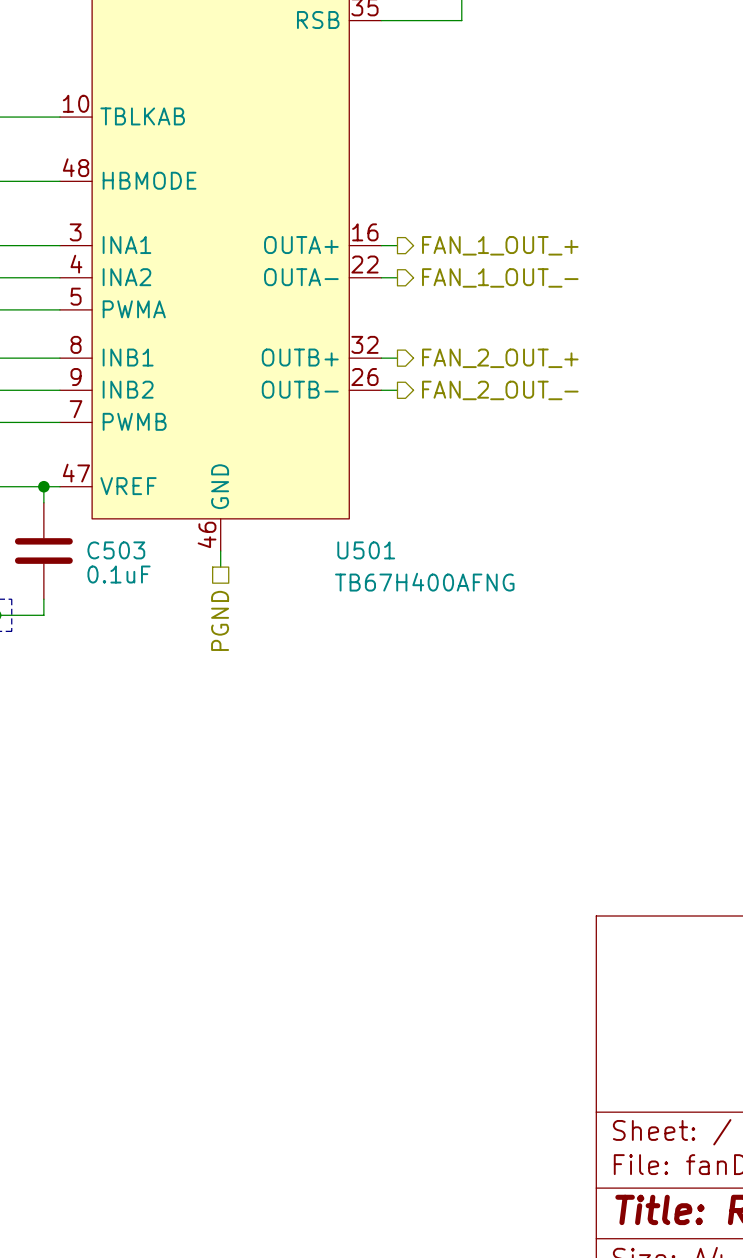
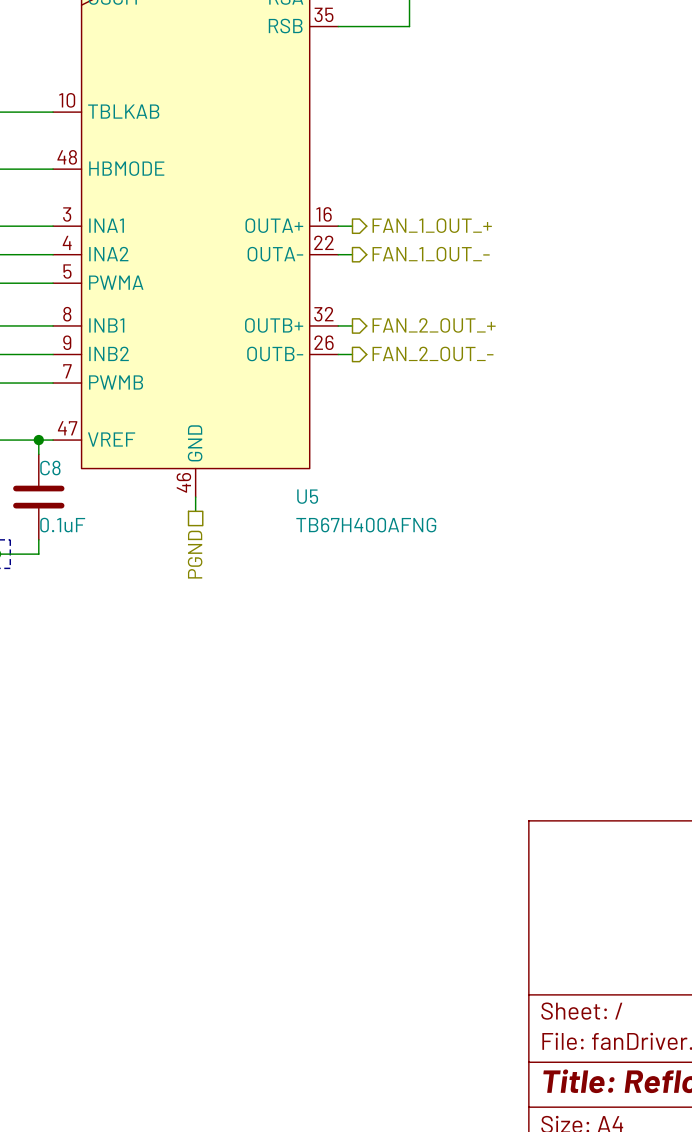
C503 name: C503 (116, 550) -> C8 (50, 468)
U501 name: U501 (366, 550) -> U5 (307, 496)
C503 value position: 0.1uF (119, 574) -> 0.1uF (62, 525)

